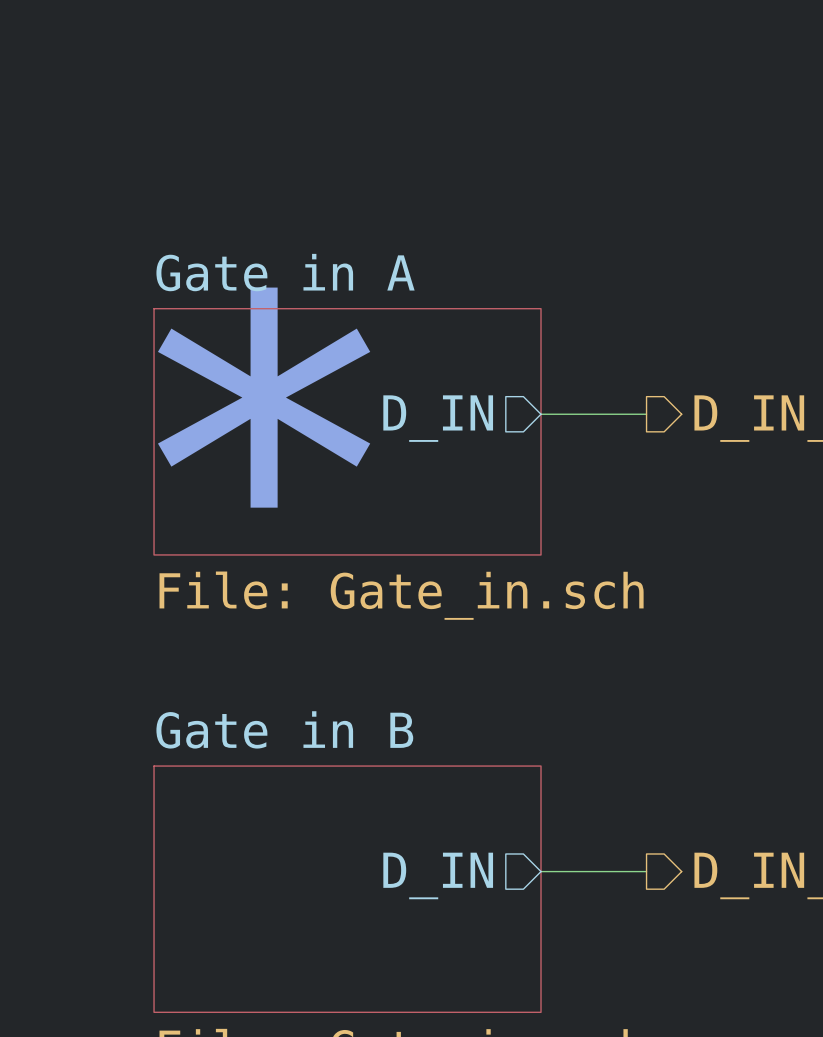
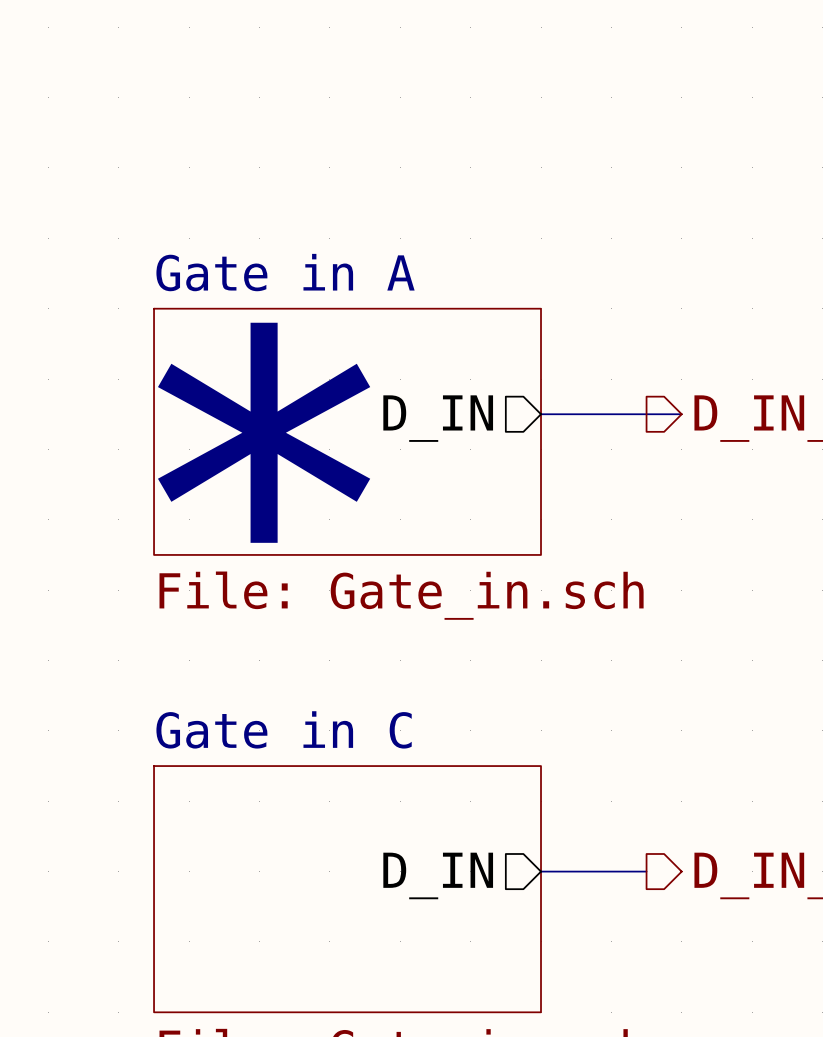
text position: * (264, 397) -> * (264, 432)
wire: none -> (646, 414) (681, 414)
sheet Gate in B name: Gate in B (284, 729) -> Gate in C (284, 729)

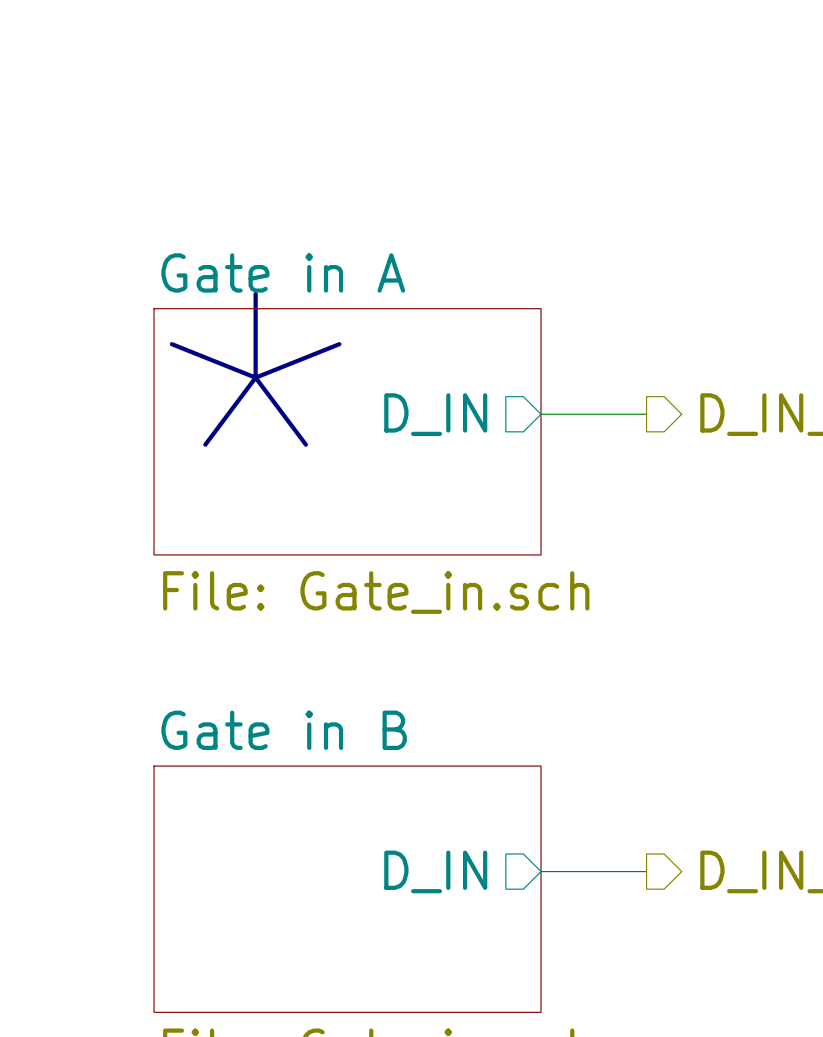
wire: (646, 414) (681, 414) -> none
text position: * (264, 432) -> * (255, 369)
sheet Gate in C name: Gate in C (284, 729) -> Gate in B (284, 730)

